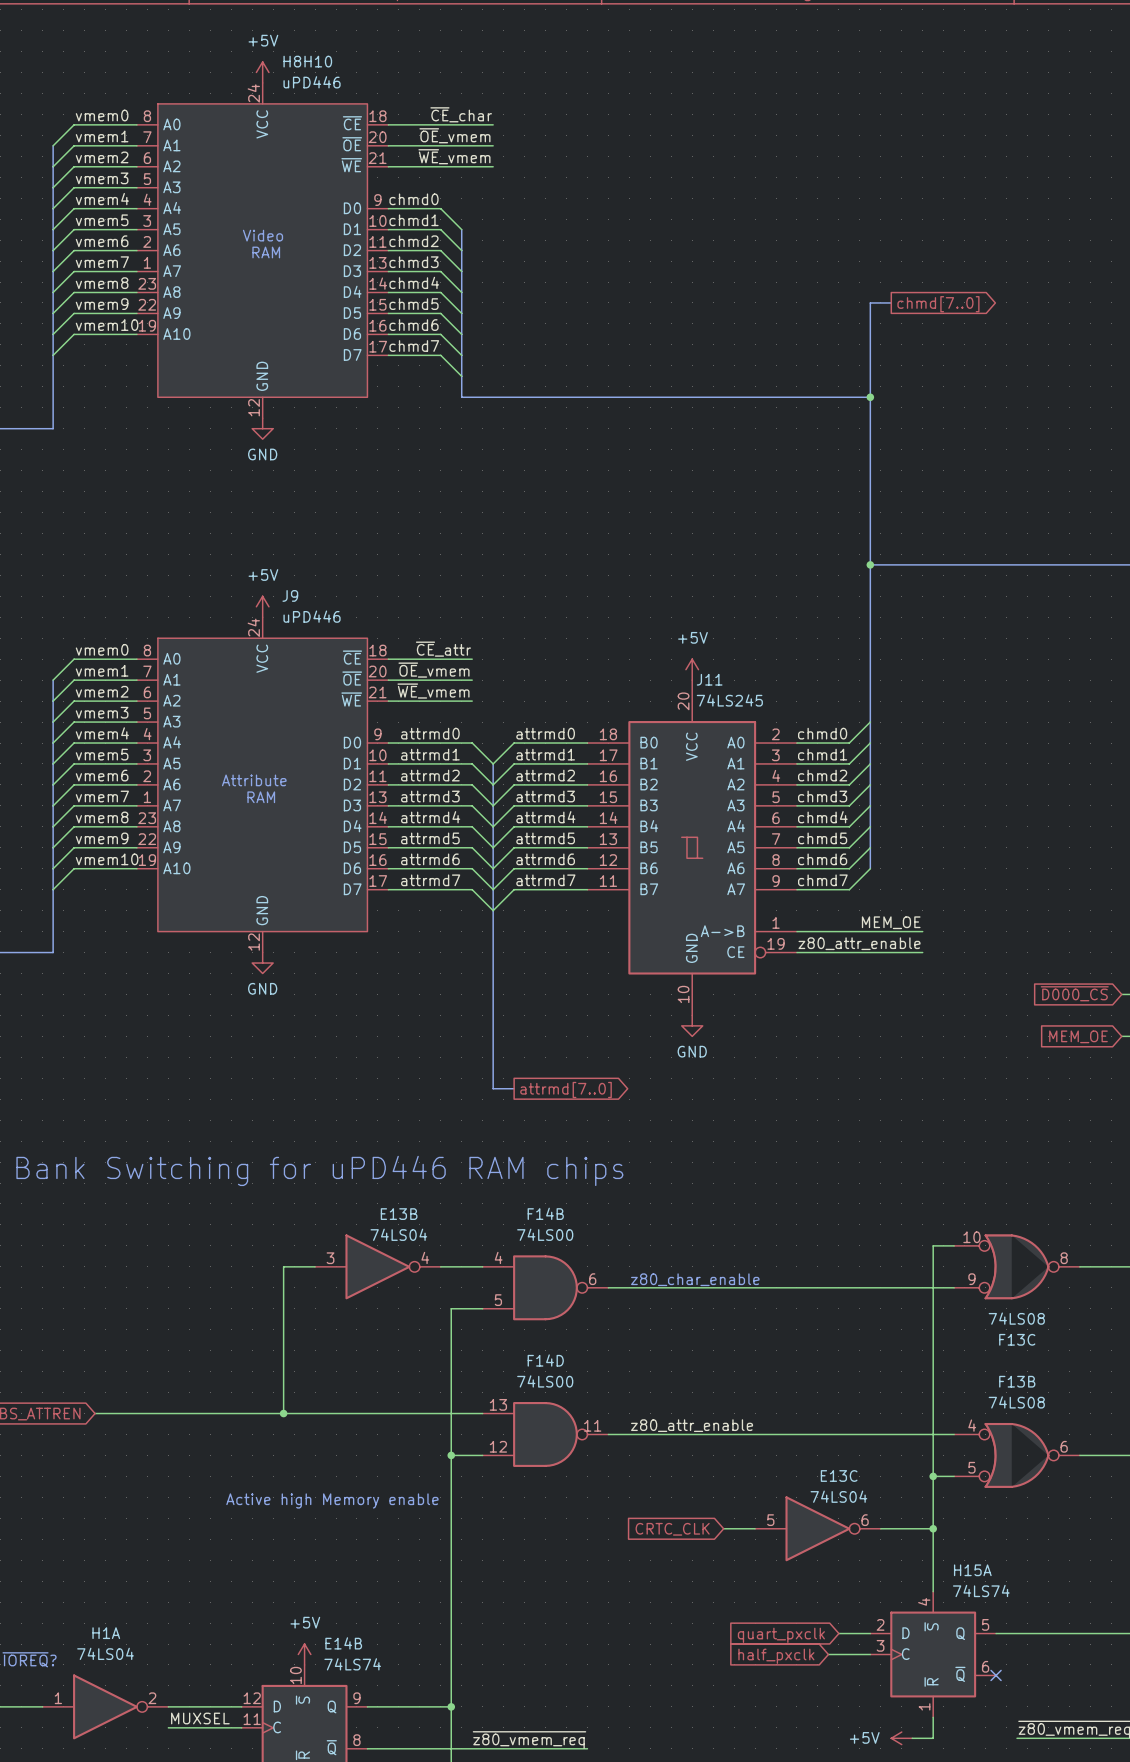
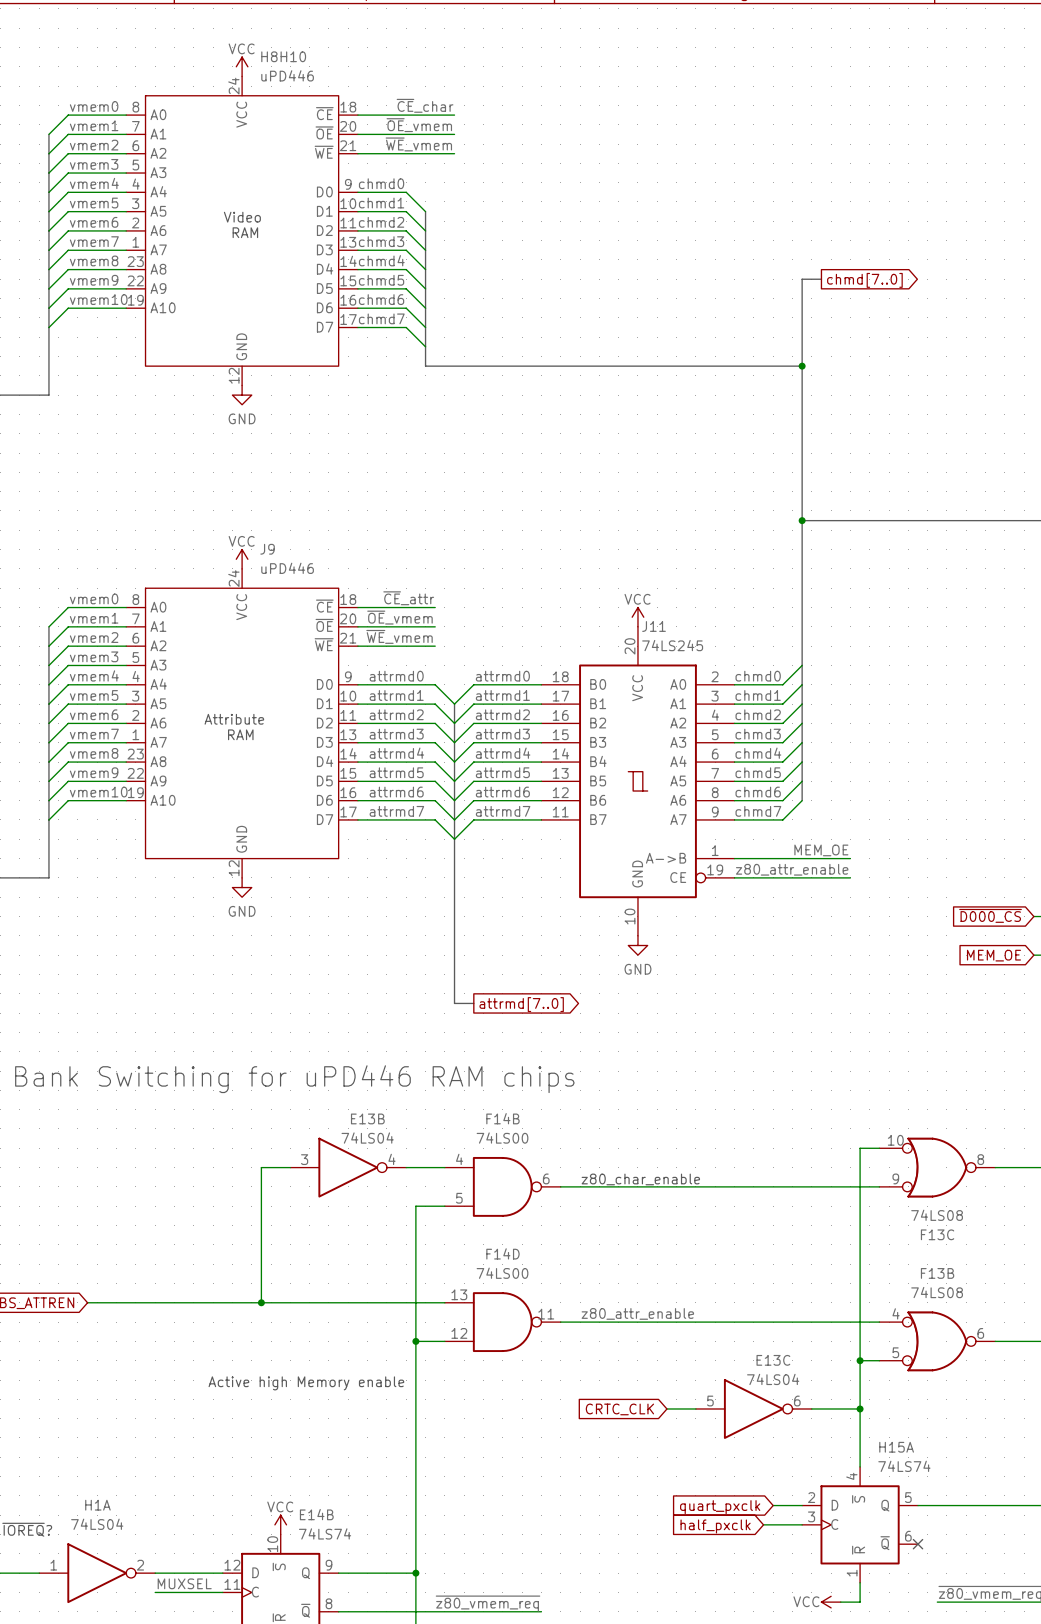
power symbol: +5V (262, 72) -> VCC (242, 66)
power symbol: +5V (262, 606) -> VCC (242, 559)
power symbol: +5V (692, 669) -> VCC (637, 617)
power symbol: +5V (304, 1654) -> VCC (280, 1524)
power symbol: +5V (901, 1738) -> VCC (831, 1602)

